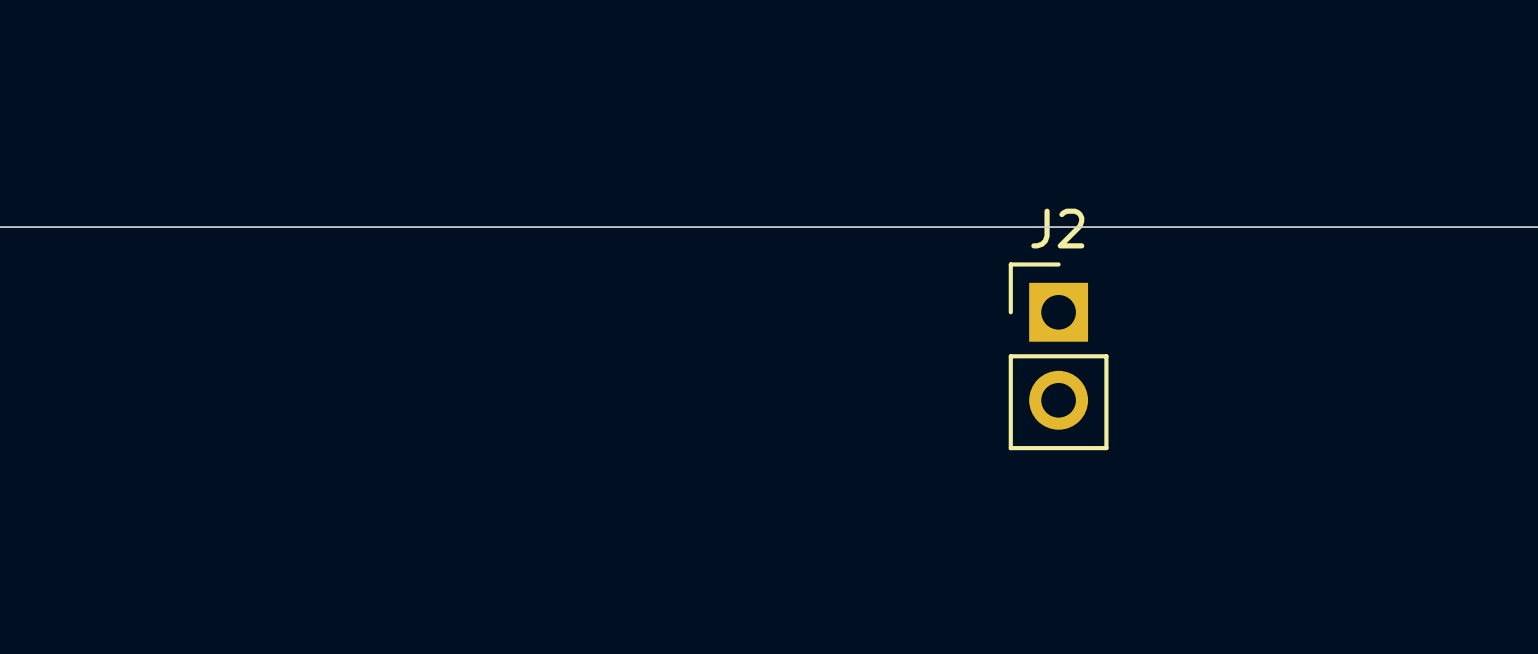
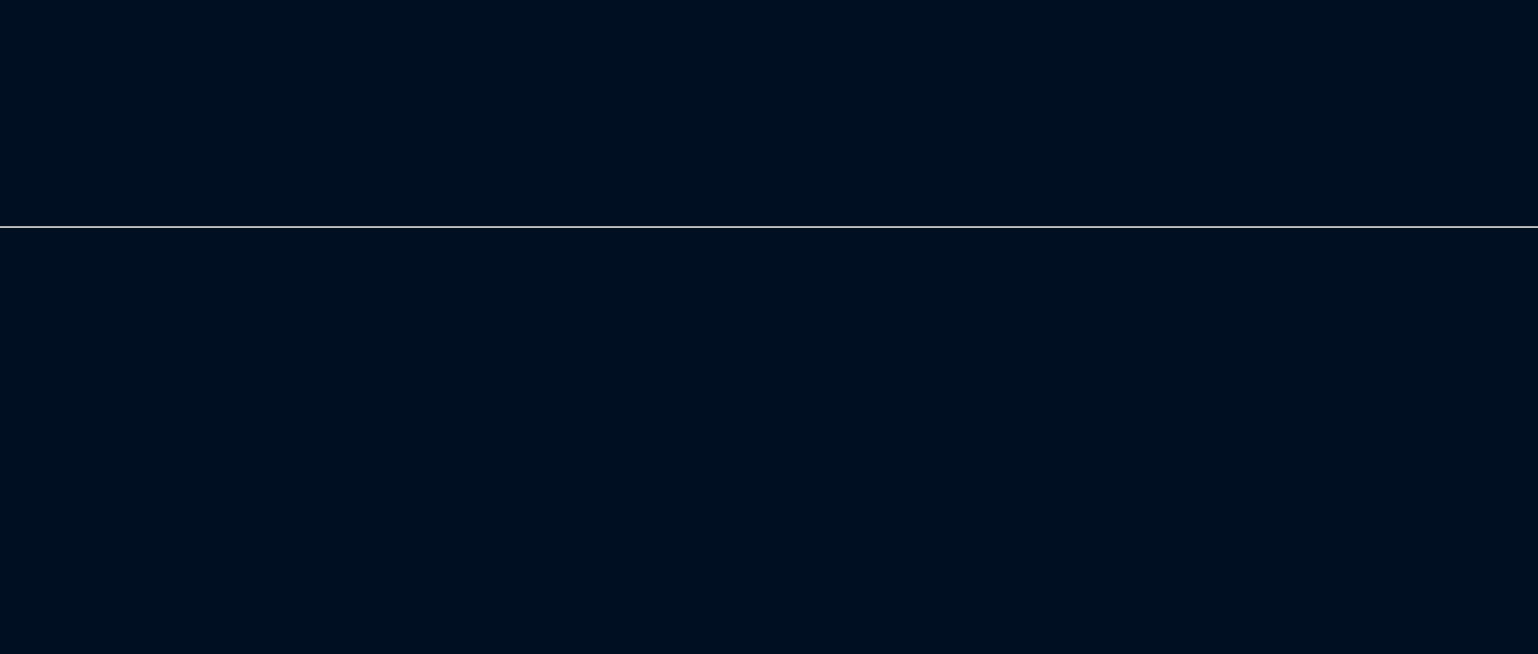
J2: (1058, 356) -> none

